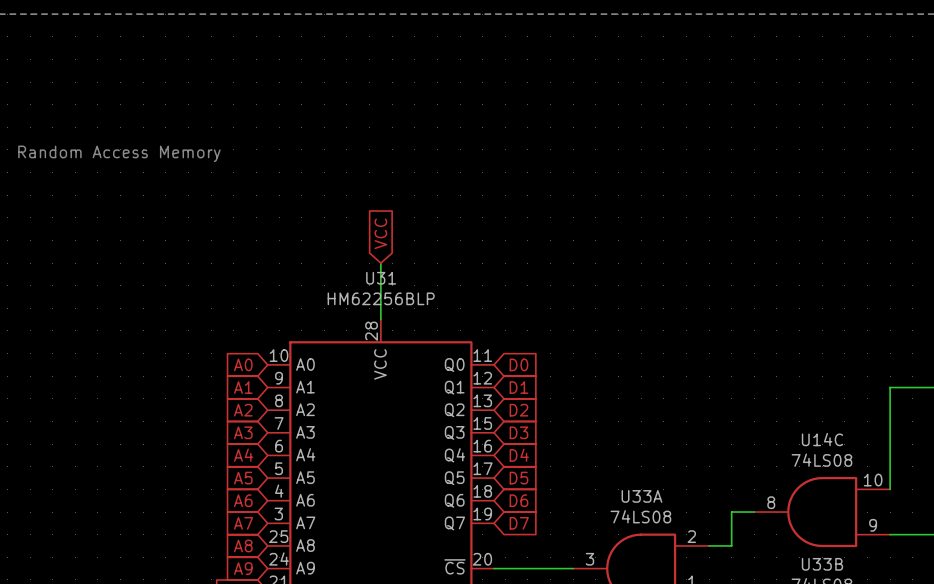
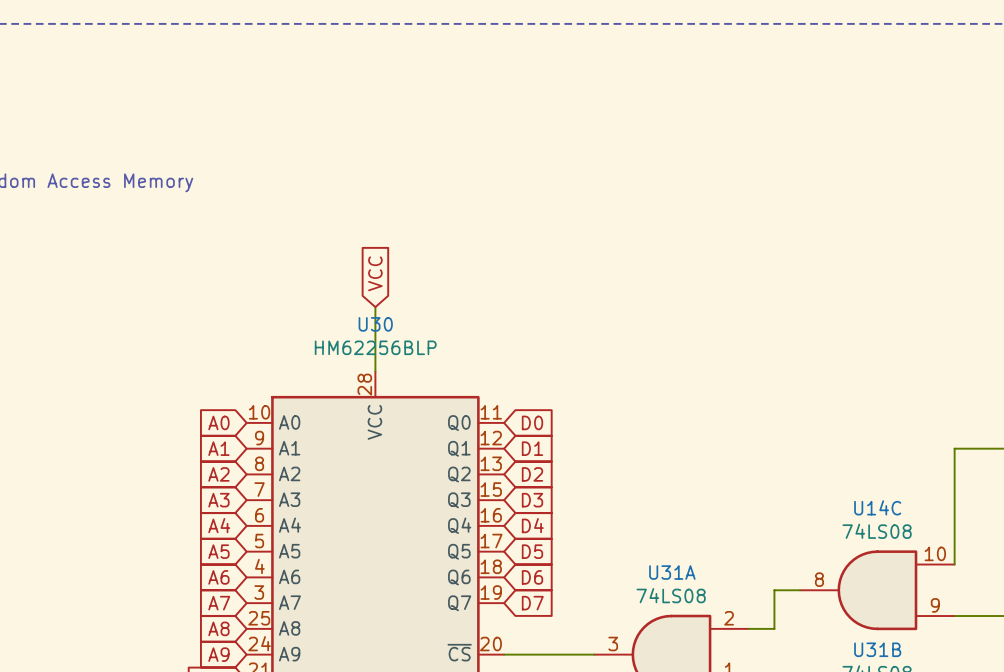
U31 name: U31 (381, 278) -> U30 (375, 324)
U33A name: U33A (641, 496) -> U31A (672, 572)
U33B name: U33B (822, 564) -> U31B (877, 649)

